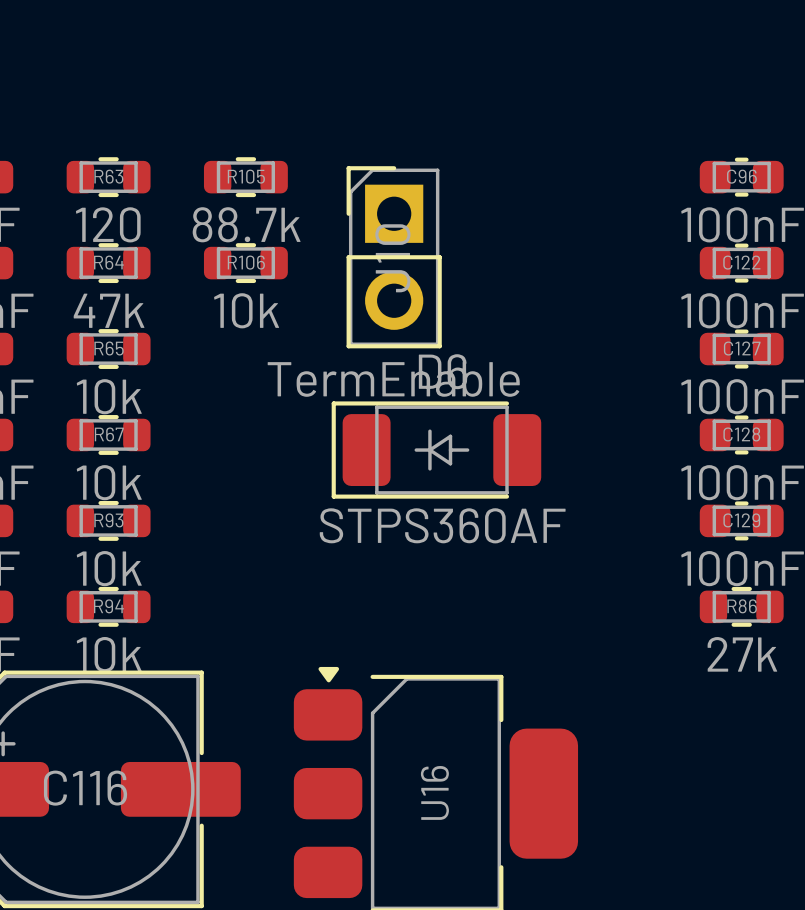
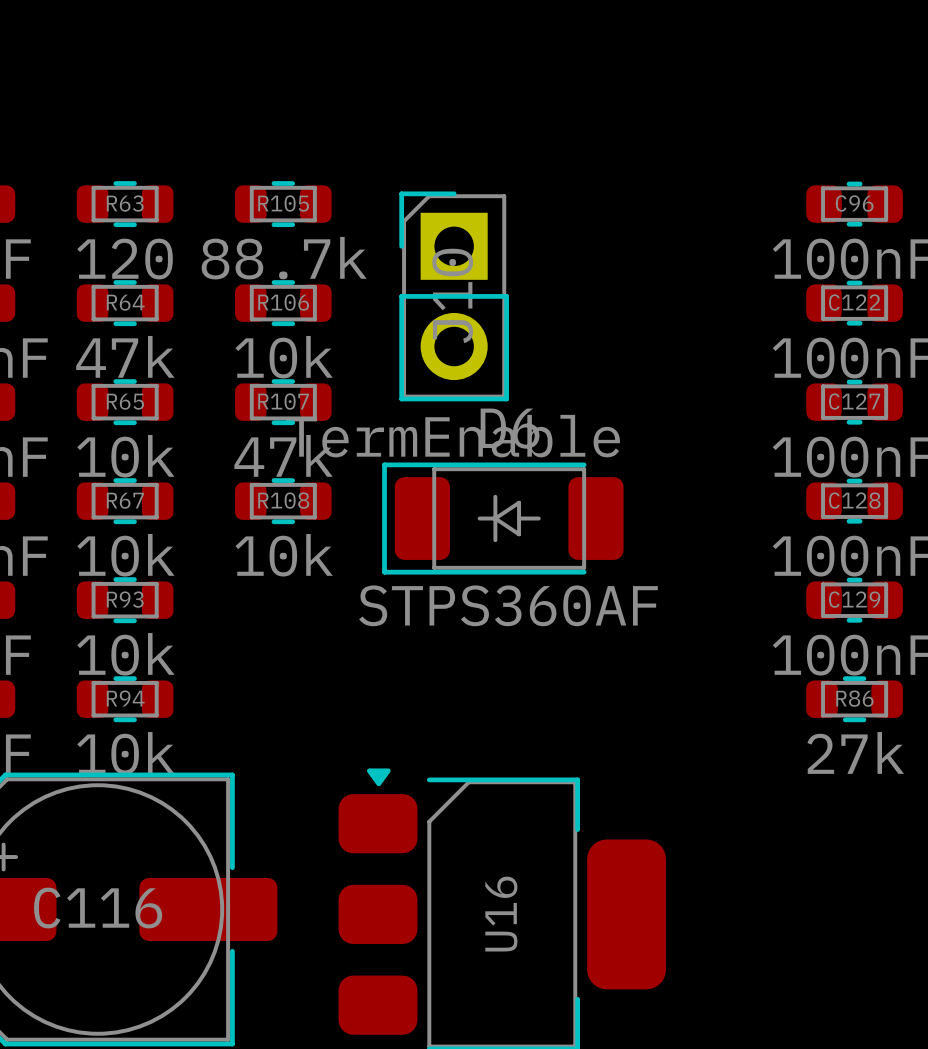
R107: none -> 47k (283, 402)
R108: none -> 10k (283, 501)

